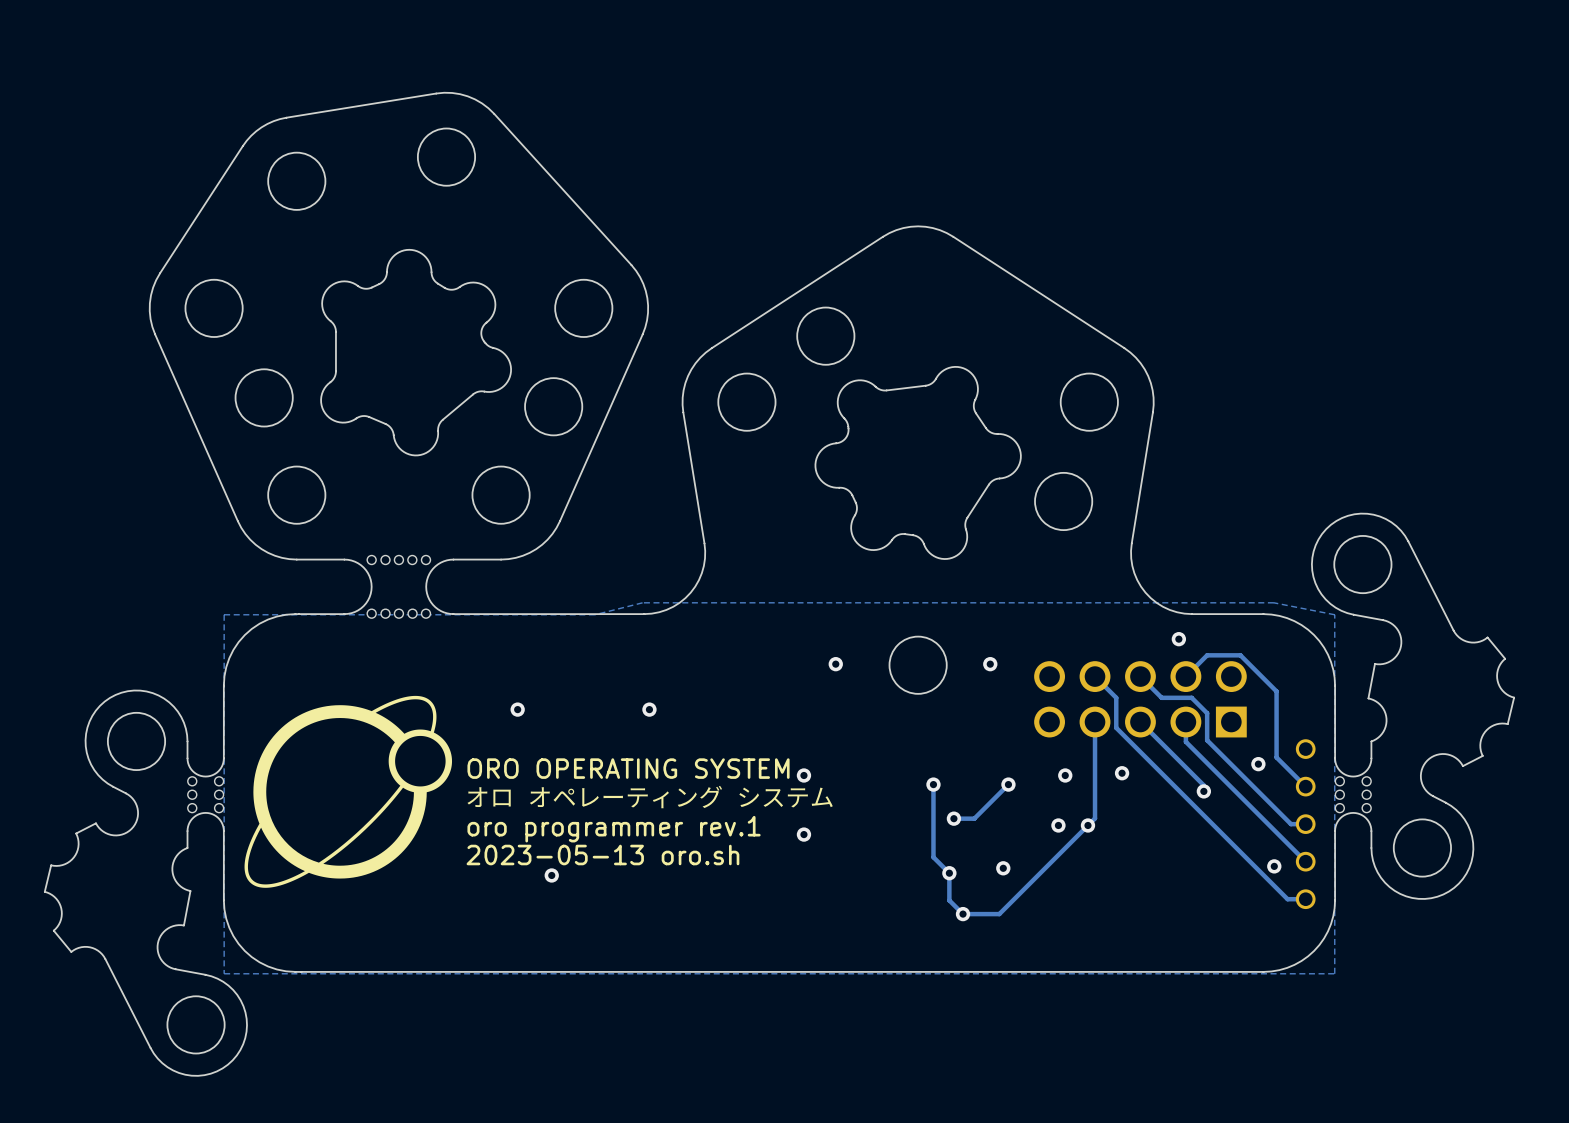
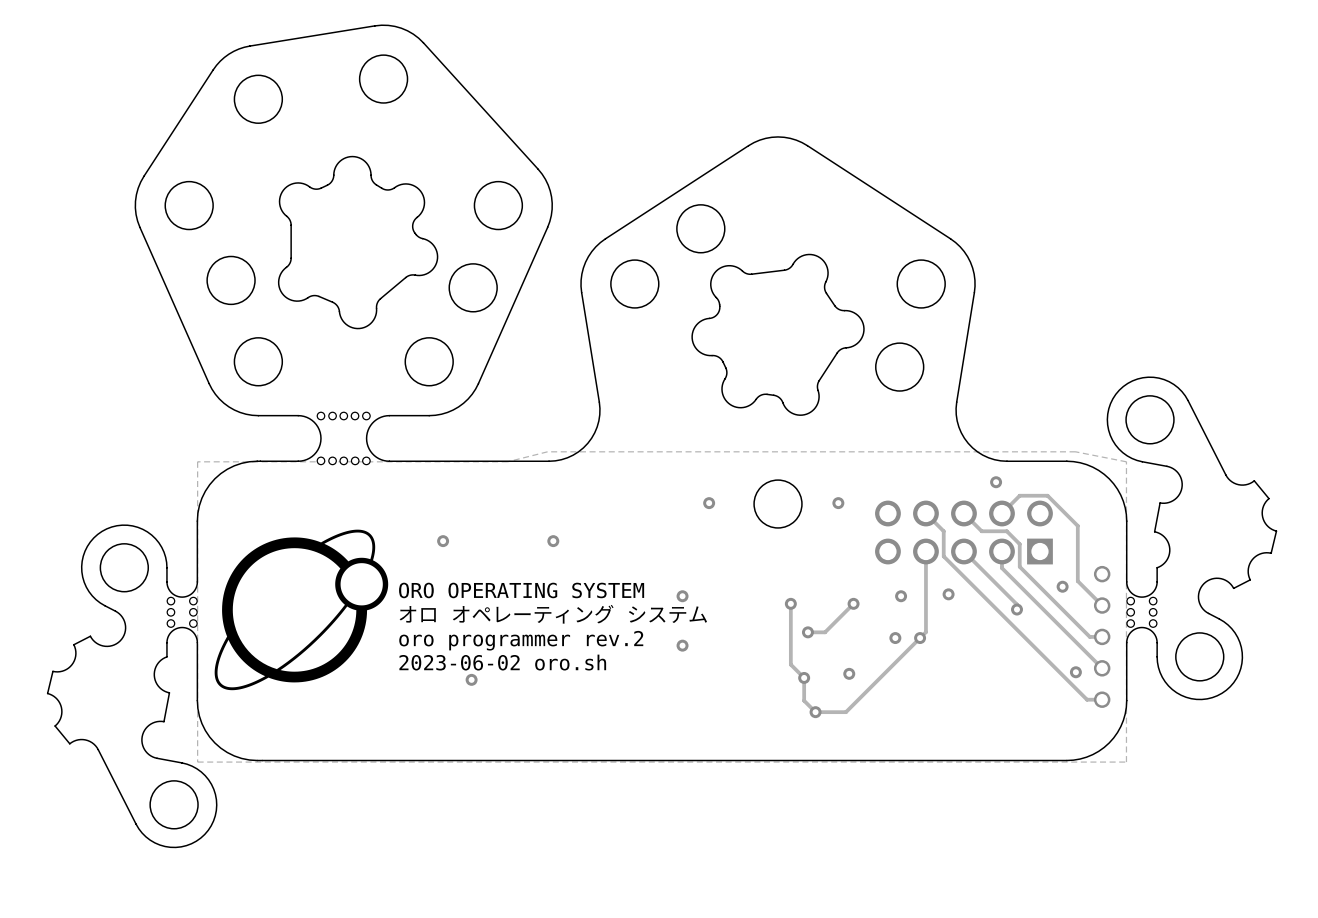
text: oro programmer rev.1 (614, 829) -> oro programmer rev.2 (521, 640)
text: 2023-05-13 oro.sh (602, 855) -> 2023-06-02 oro.sh (502, 662)

